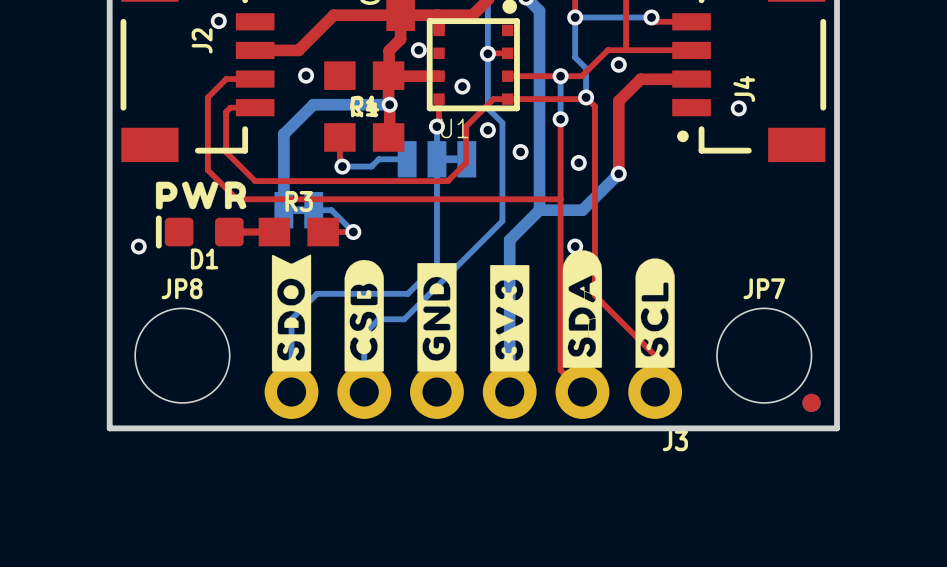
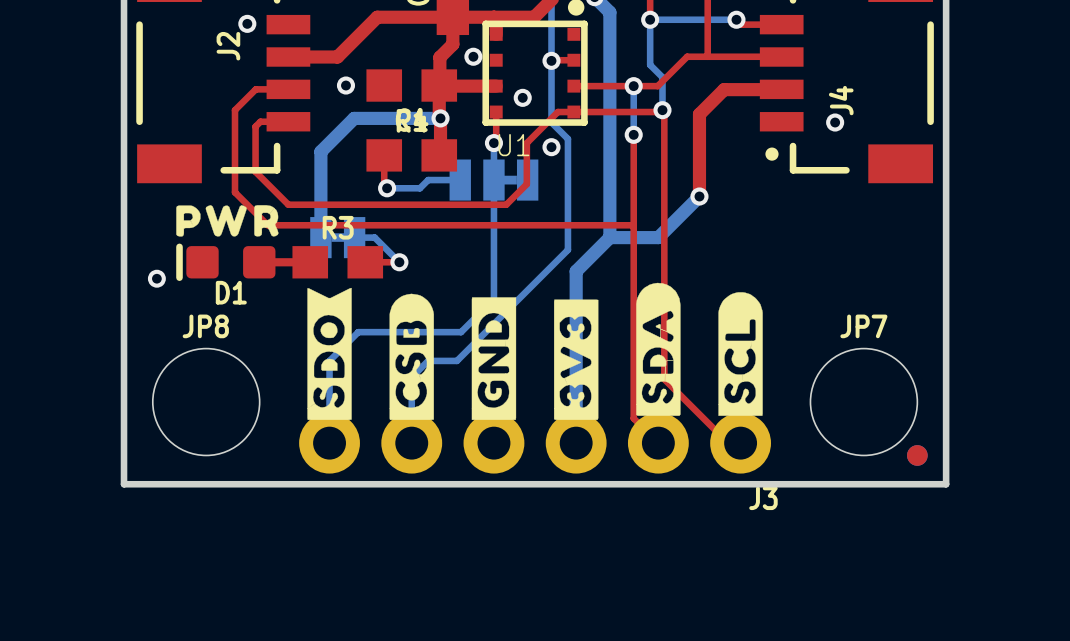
via: (618, 64) -> none
top track: (587, 99) (594, 106) (594, 295) (655, 355) (655, 392) -> (664, 112) (664, 379) (728, 443) (740, 443)
via: (520, 152) -> none
via: (578, 162) -> none
via: (575, 246) -> none

